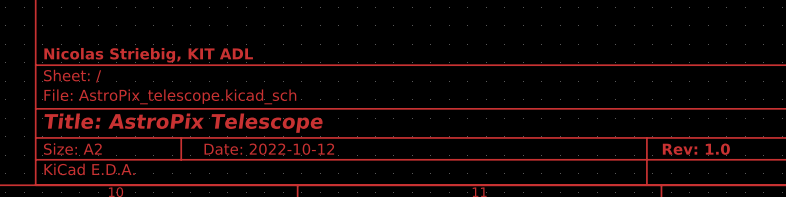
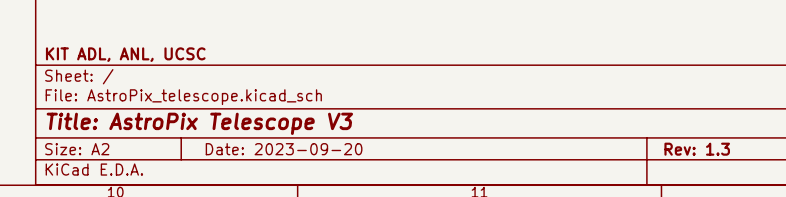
title block: Nicolas Striebig, KIT ADL (148, 55) -> KIT ADL, ANL, UCSC (125, 54)
title block: Title: AstroPix Telescope (183, 123) -> Title: AstroPix Telescope V3 (199, 123)
title block: Date: 2022-10-12 (269, 149) -> Date: 2023-09-20 (284, 149)
title block: Rev: 1.0 (696, 149) -> Rev: 1.3 (697, 149)

